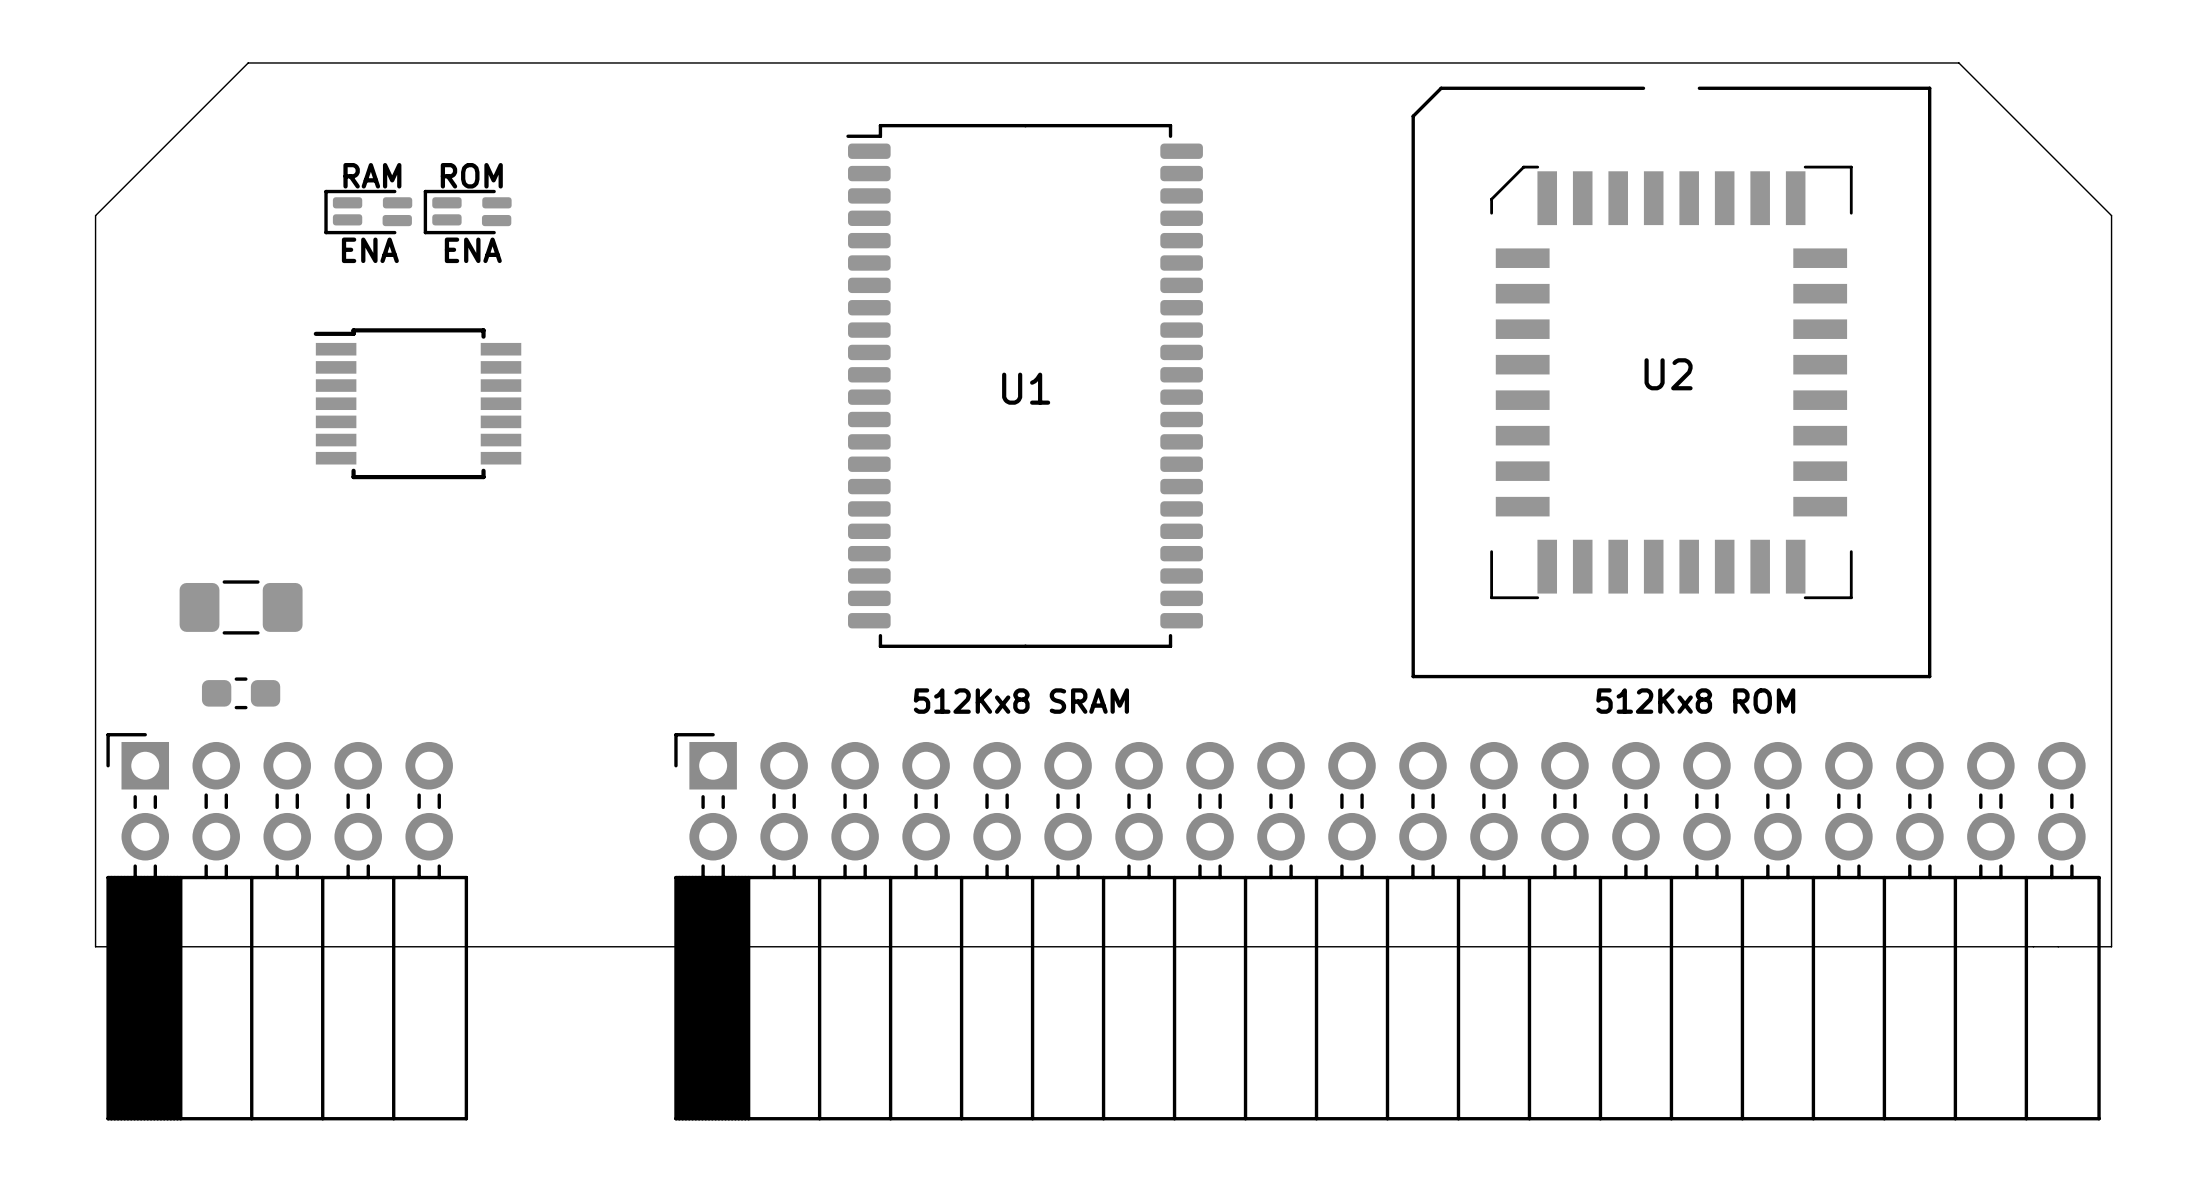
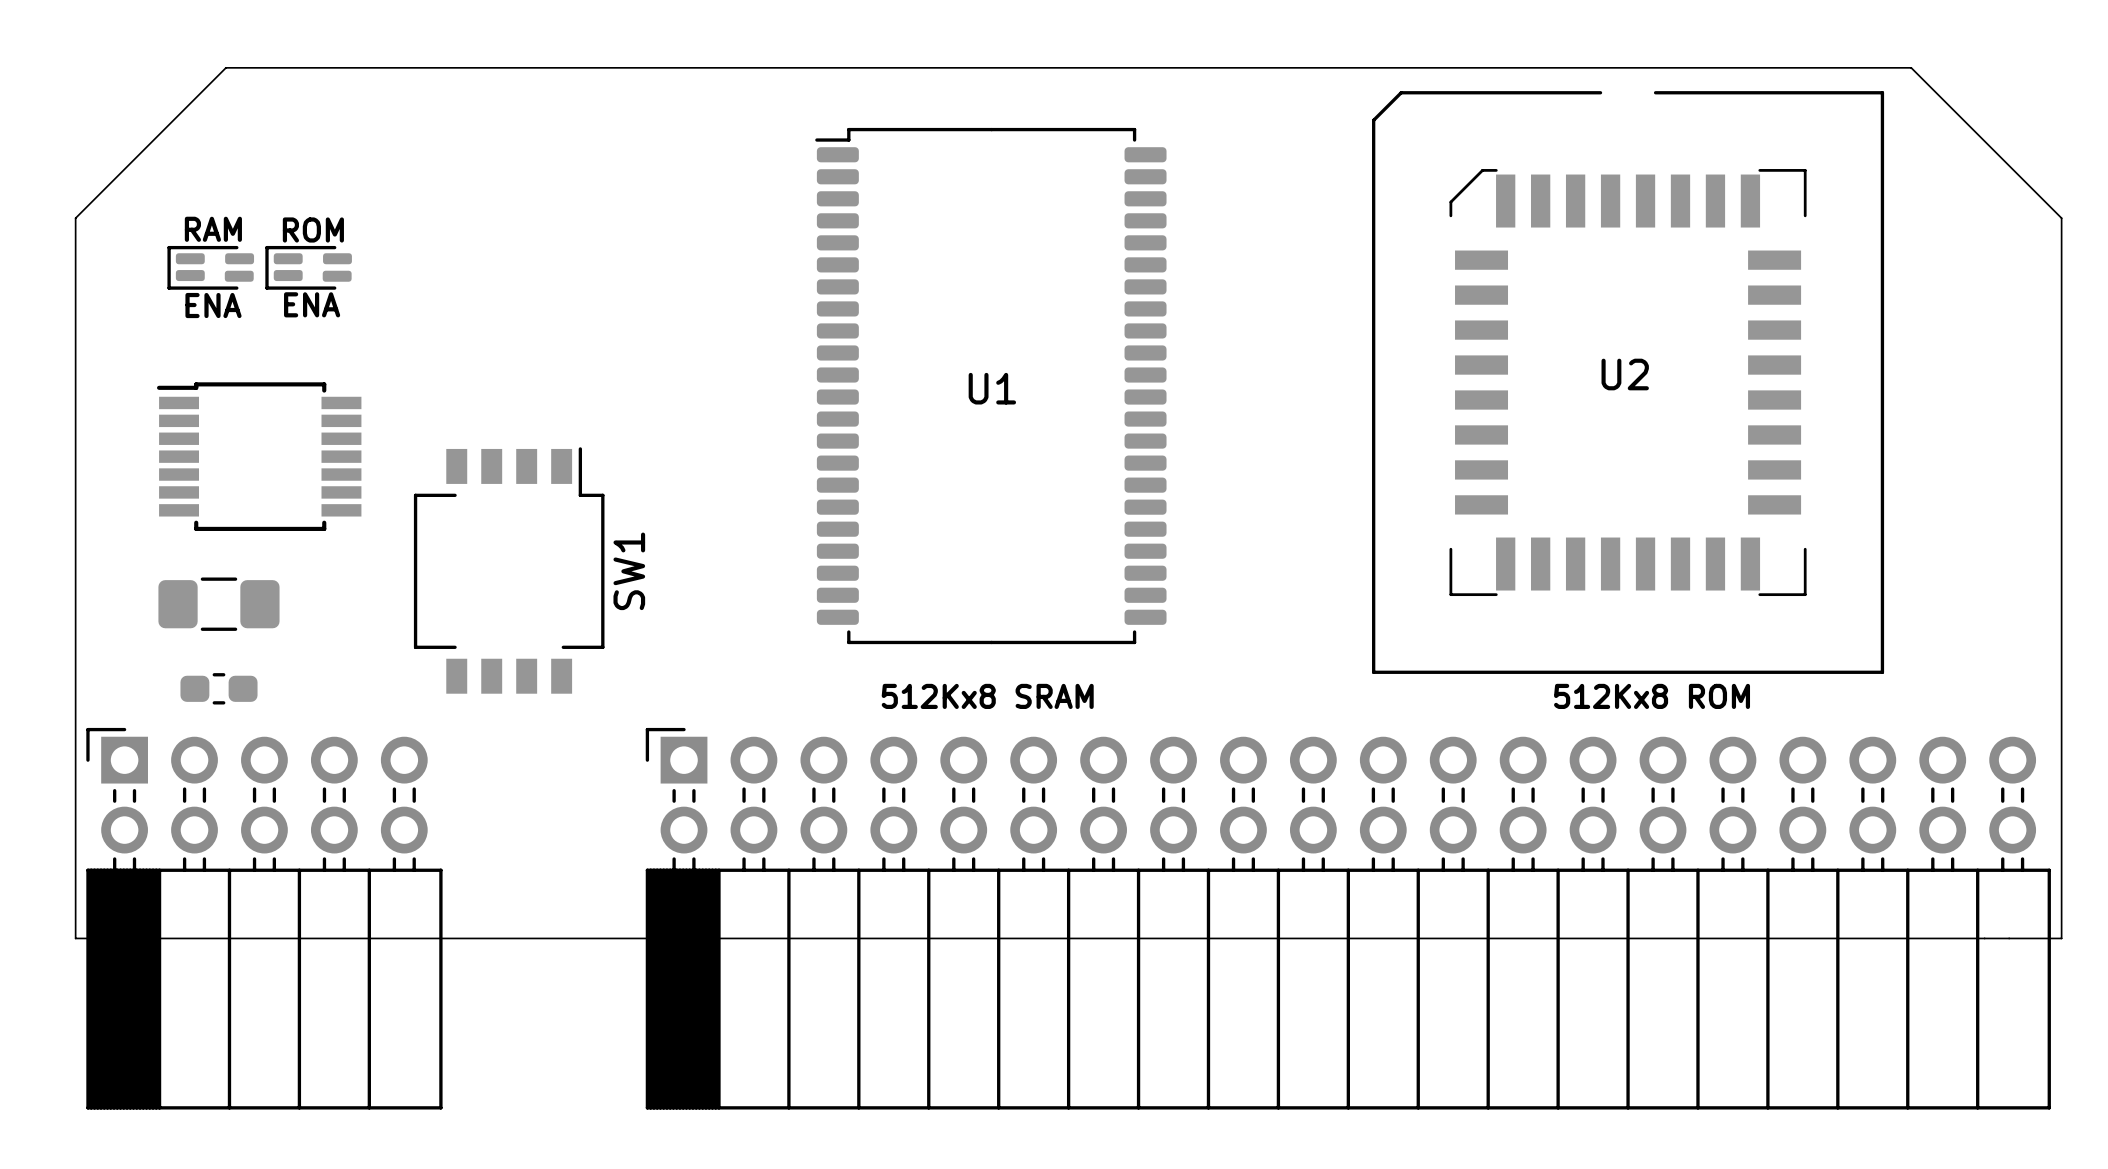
text position: RAM (372, 175) -> RAM (213, 229)
text position: ROM (471, 175) -> ROM (313, 229)
part position: (368, 212) -> (308, 267)
part: (467, 212) -> none
text position: ENA (370, 250) -> ENA (312, 304)
text: ENA (473, 250) -> none
part: none -> (210, 267)
text: none -> ENA (213, 305)
part position: (417, 403) -> (259, 456)
SW1: none -> (509, 570)

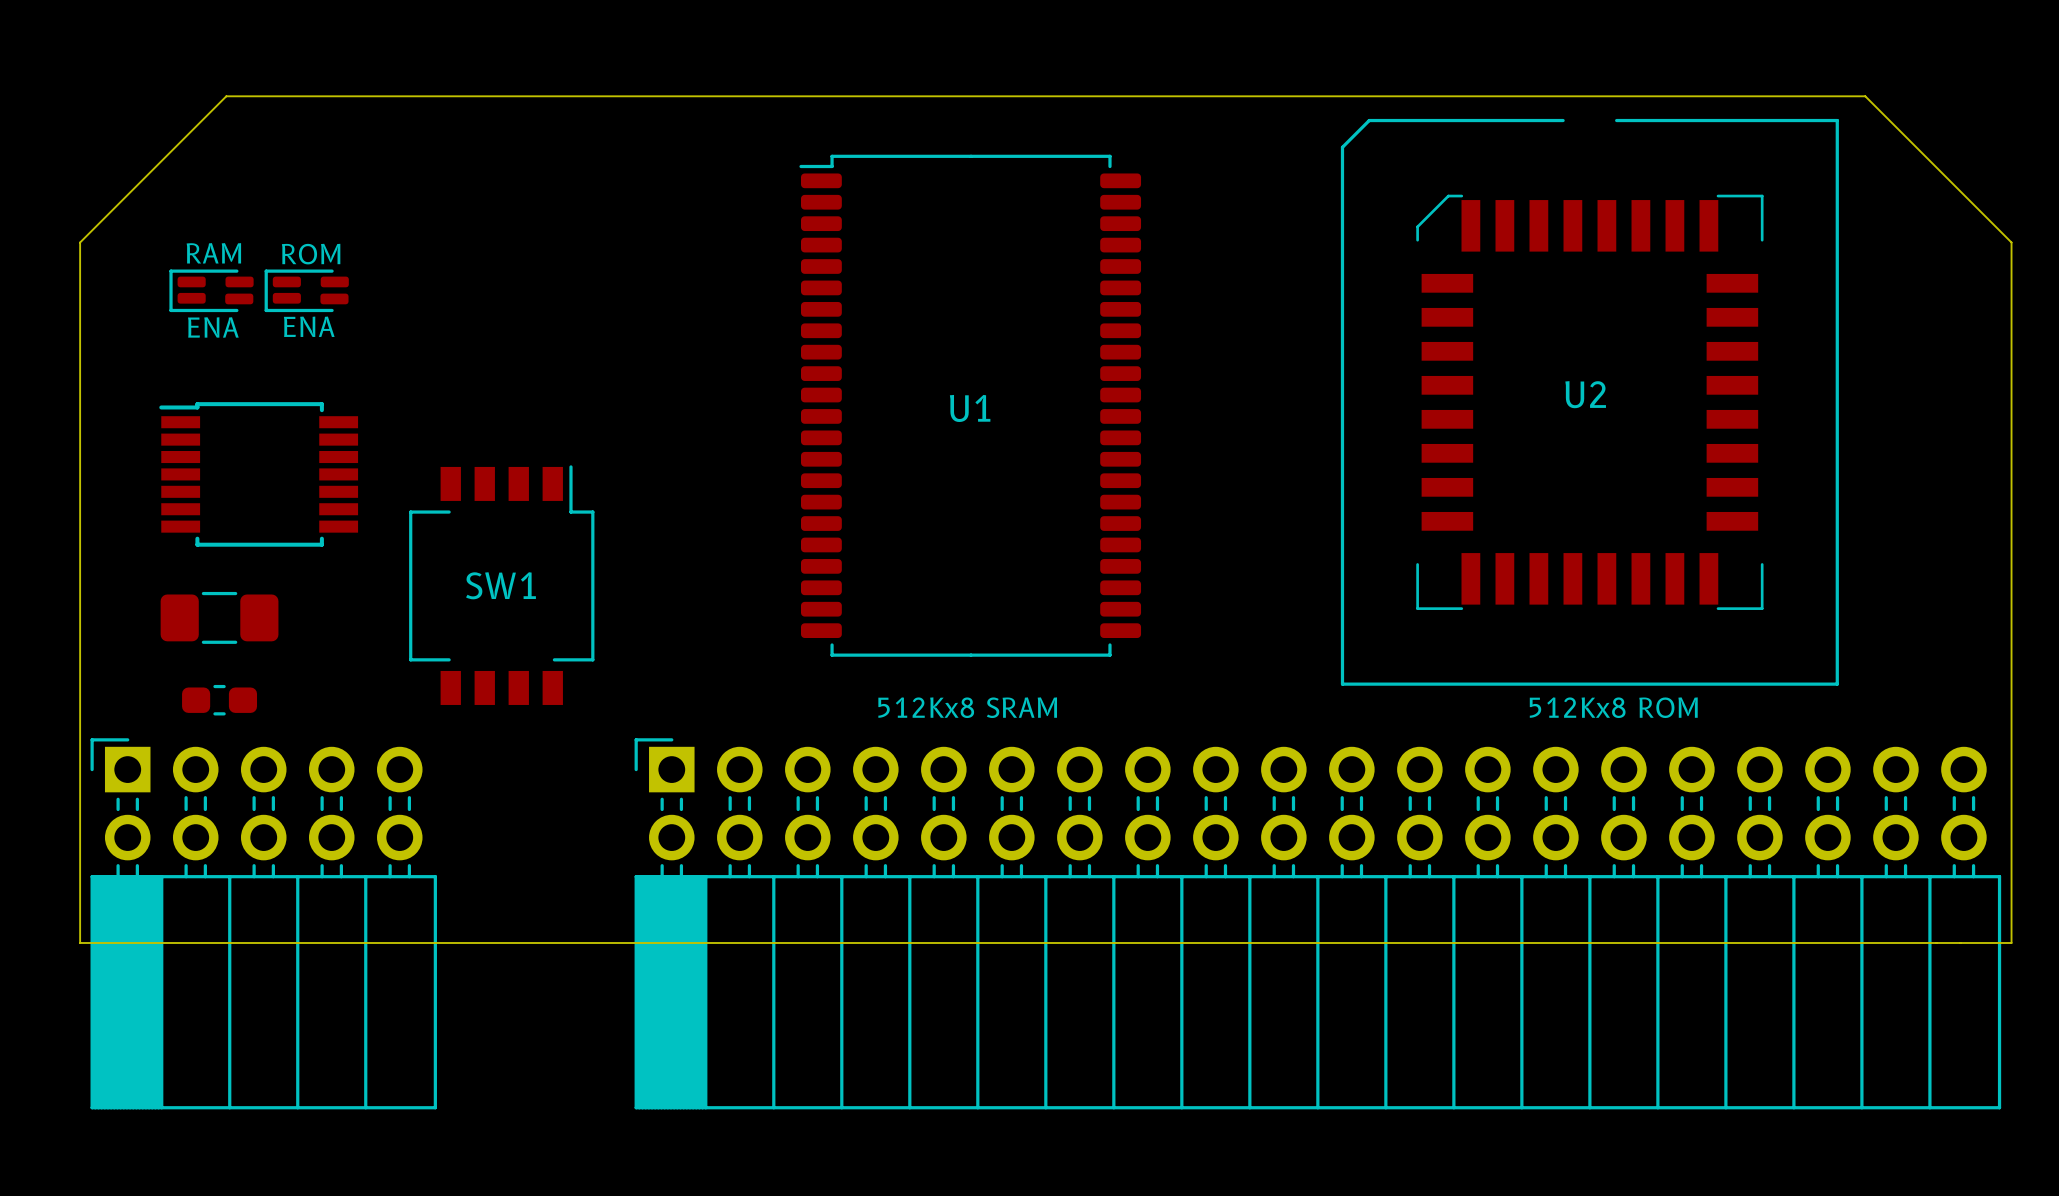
SW1 name rotation: 0° (629, 571) -> 90° clockwise (500, 585)
SW1 name position: SW1 (629, 571) -> SW1 (500, 585)

